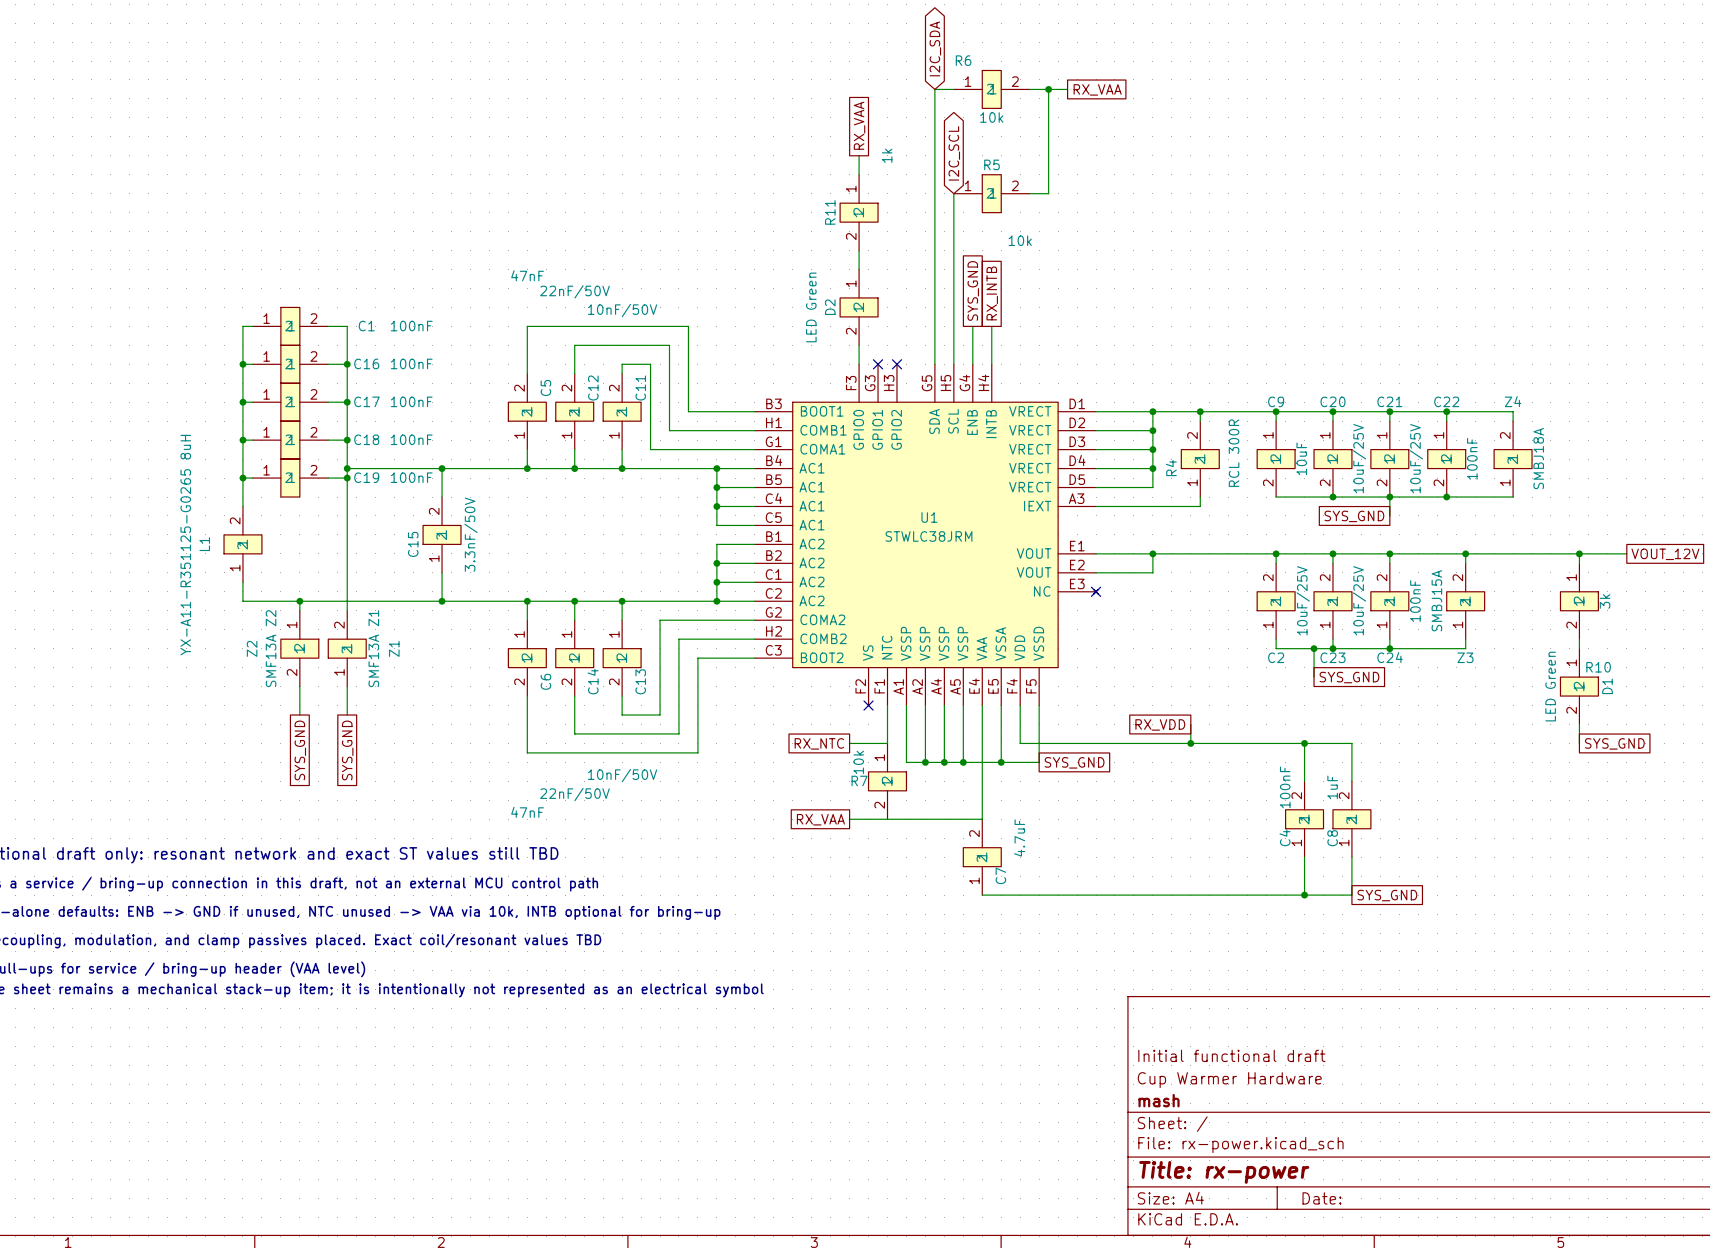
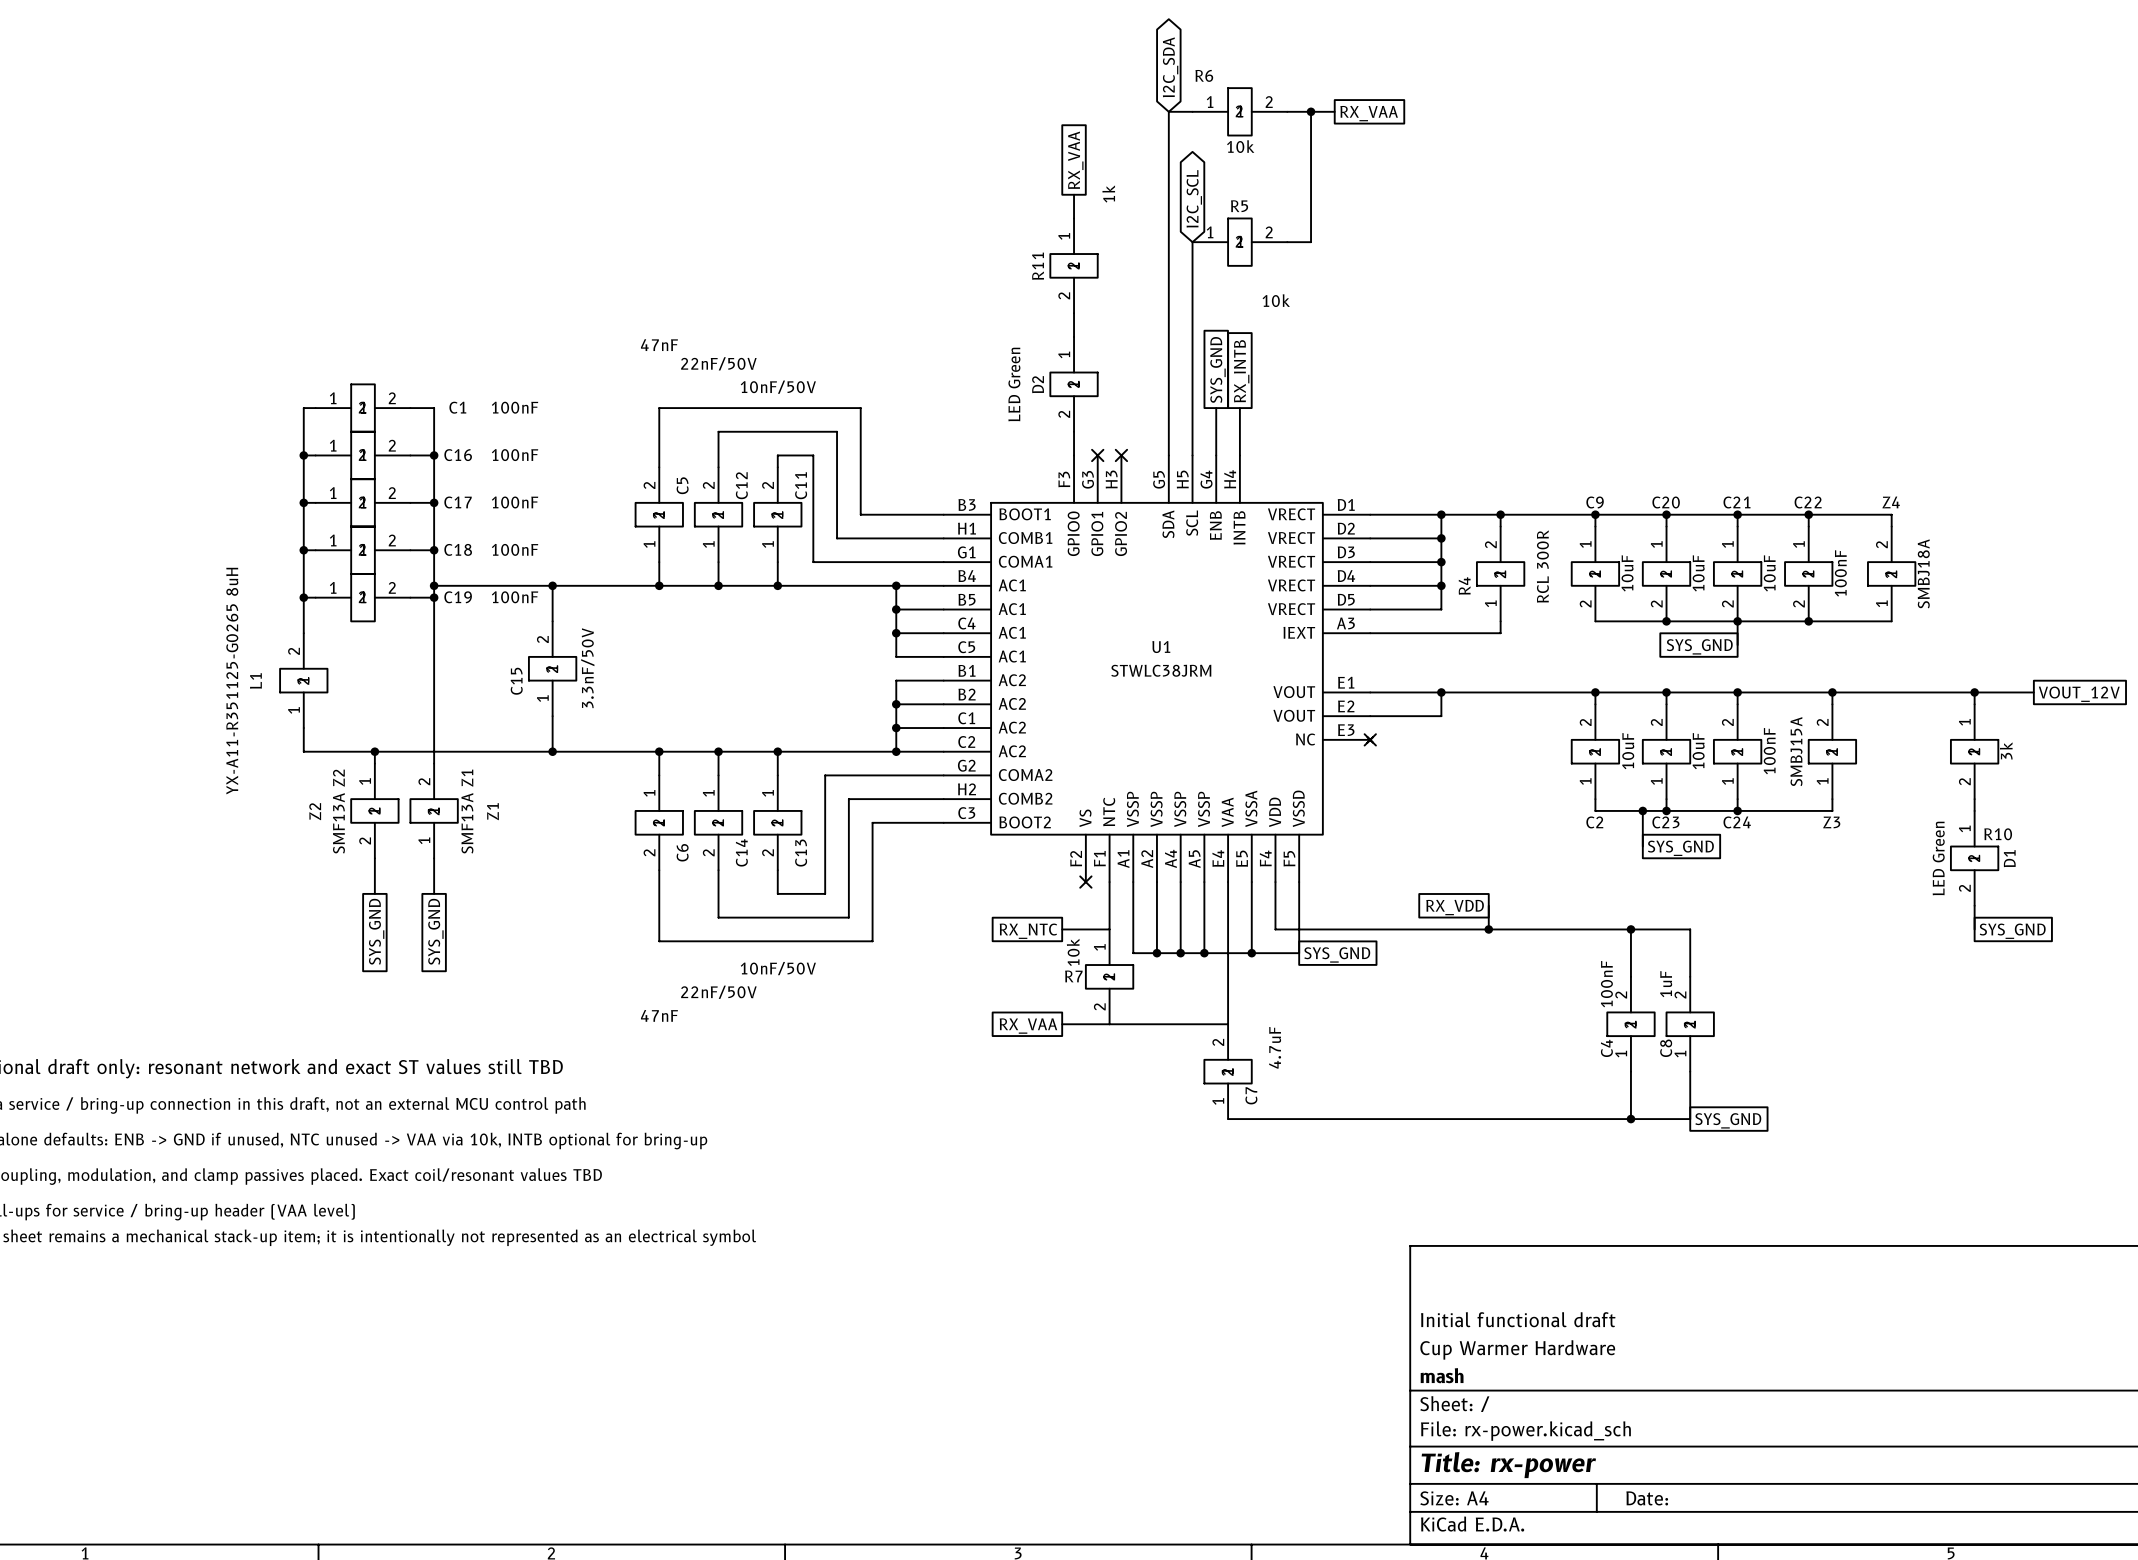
C20 value: 10uF/25V (1359, 458) -> 10uF (1698, 573)
C21 value: 10uF/25V (1416, 458) -> 10uF (1769, 573)
C2 value: 10uF/25V (1303, 600) -> 10uF (1628, 751)
C23 value: 10uF/25V (1359, 600) -> 10uF (1698, 751)

